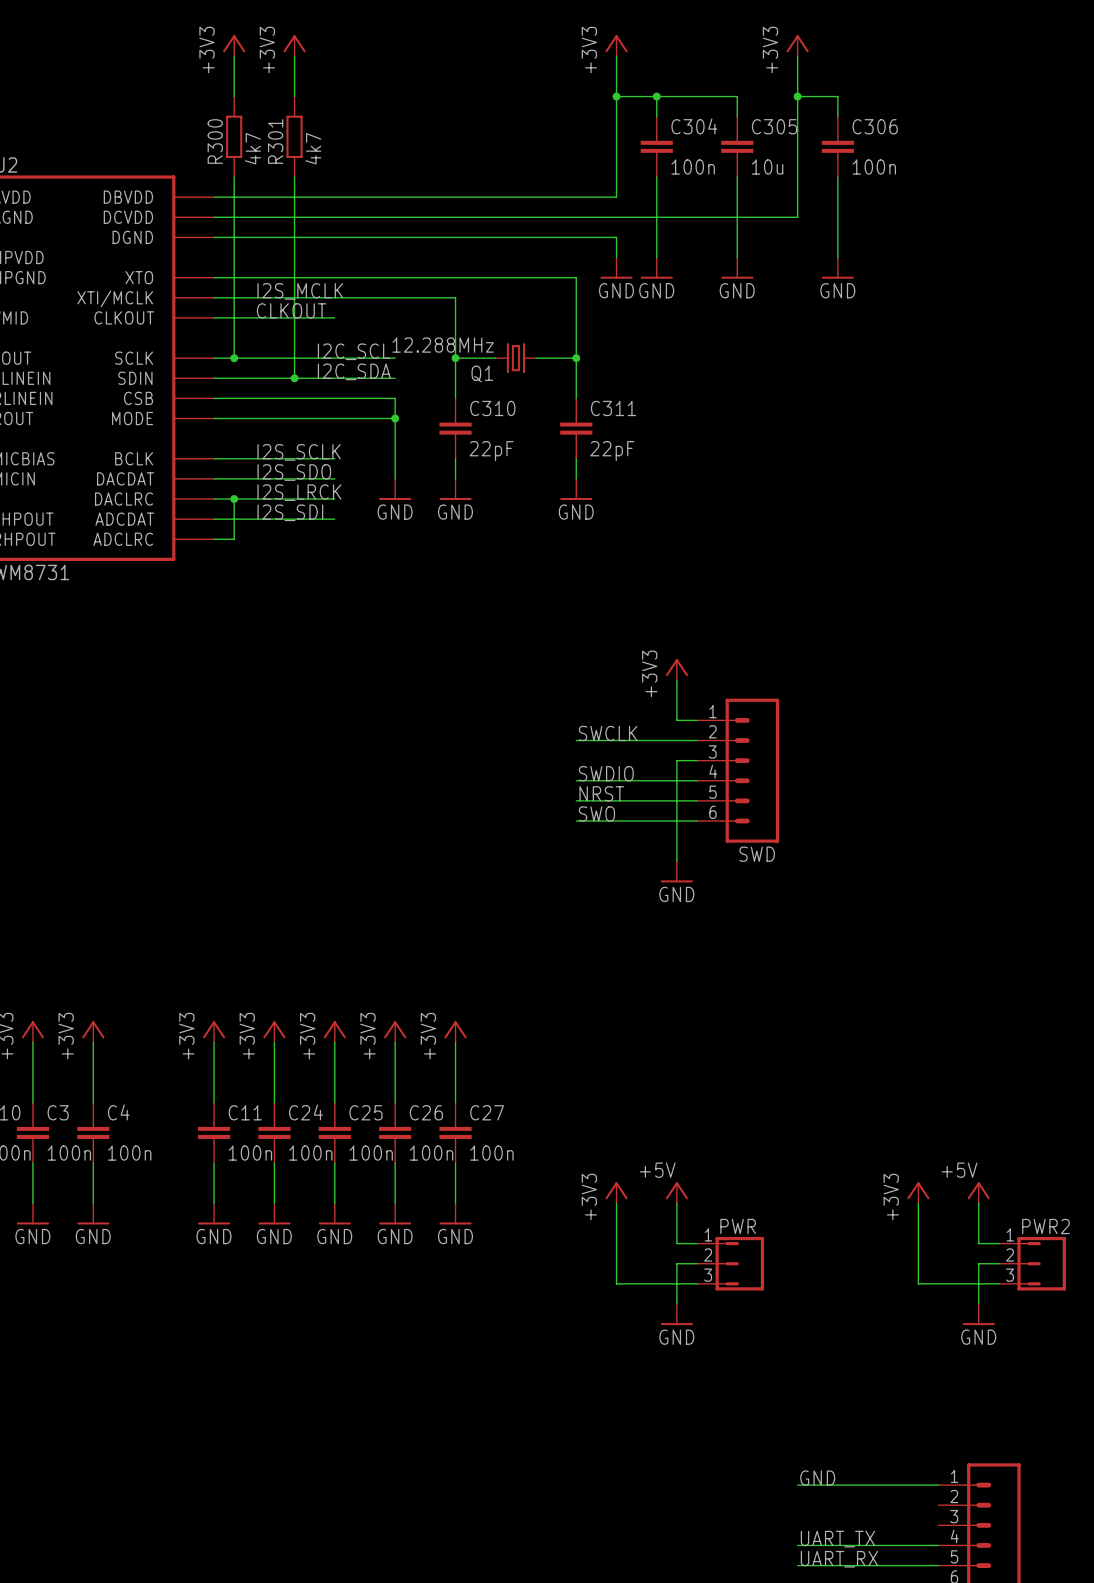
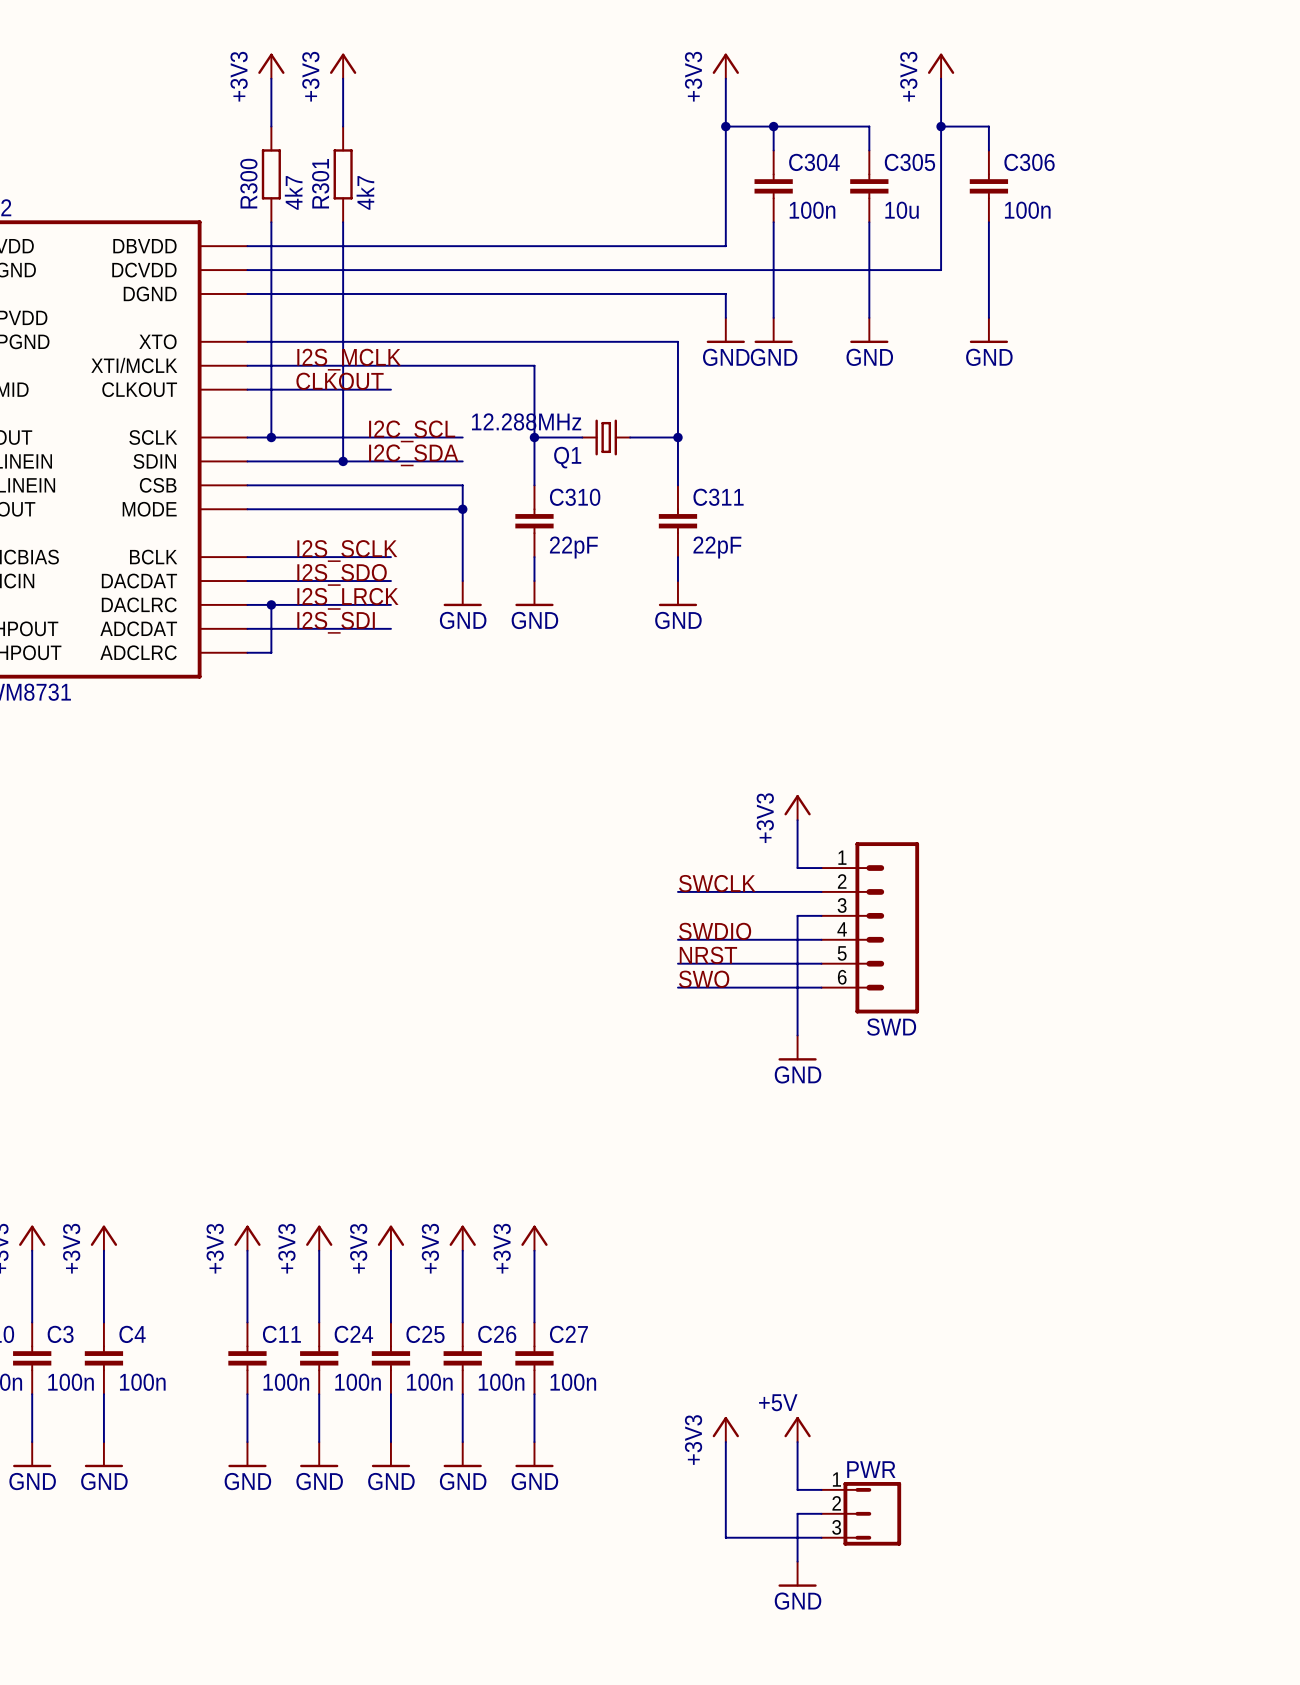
power symbol: +3V3 (918, 1192) -> none
power symbol: +5V (978, 1192) -> none
wire: (918, 1203) (918, 1283) (998, 1283) -> none
wire: (978, 1203) (978, 1243) (998, 1243) -> none
wire: (998, 1263) (978, 1263) (978, 1303) -> none
PWR2: (1032, 1263) -> none
power symbol: GND (978, 1314) -> none

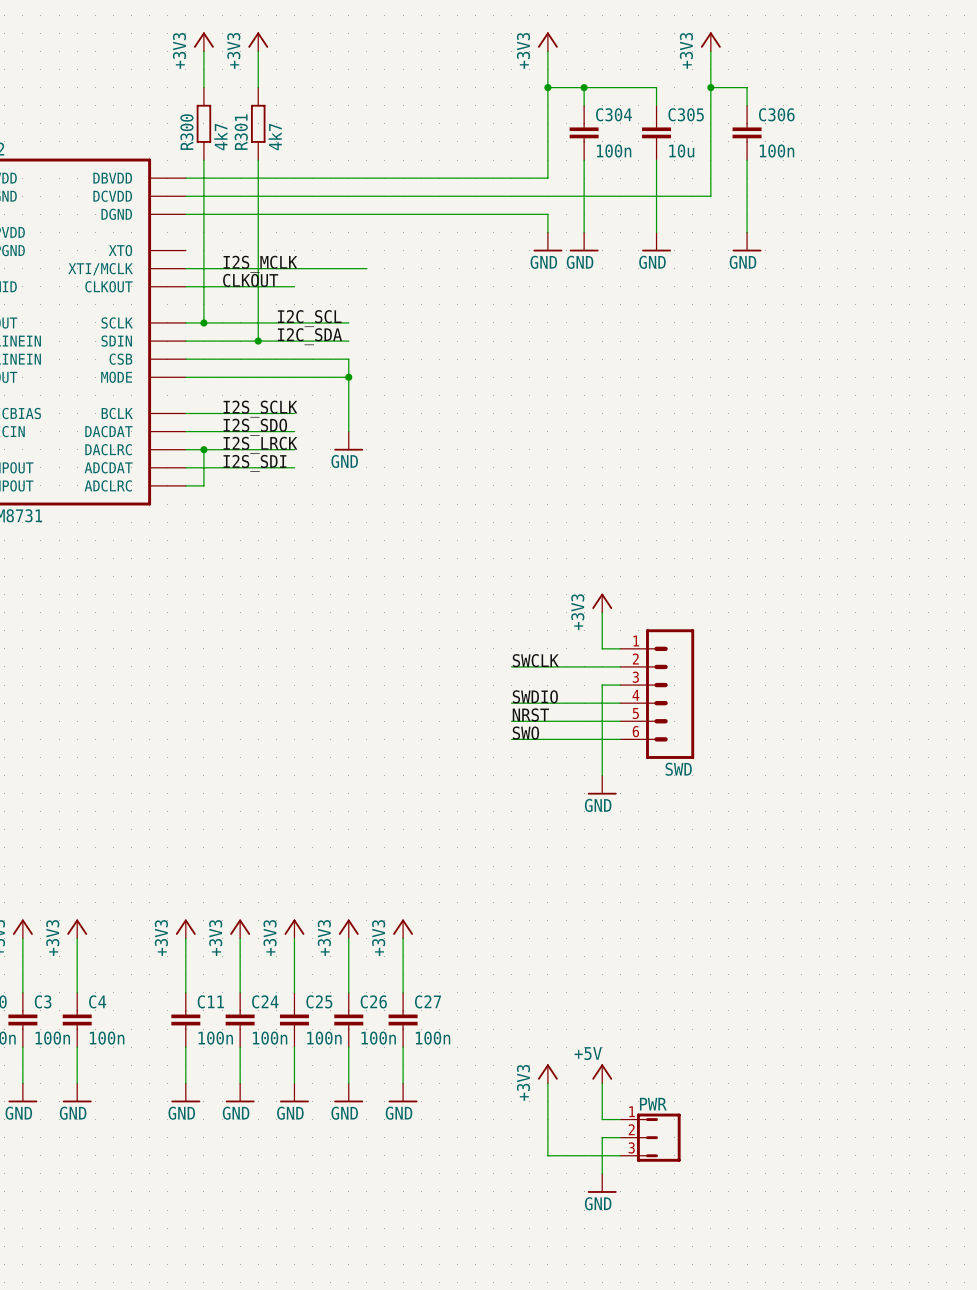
wire: (247, 341) (677, 341) (677, 485) -> none
wire: (486, 365) (534, 365) (534, 485) -> none
wire: (534, 437) (582, 437) -> none
junction: (534, 437) -> none
Q1: 12.288MHz (606, 437) -> none
wire: (630, 437) (677, 437) -> none
junction: (677, 437) -> none
C310: 22pF (534, 521) -> none
C311: 22pF (677, 521) -> none
wire: (534, 557) (534, 581) -> none
wire: (677, 557) (677, 581) -> none
power symbol: GND (534, 593) -> none
power symbol: GND (677, 593) -> none

